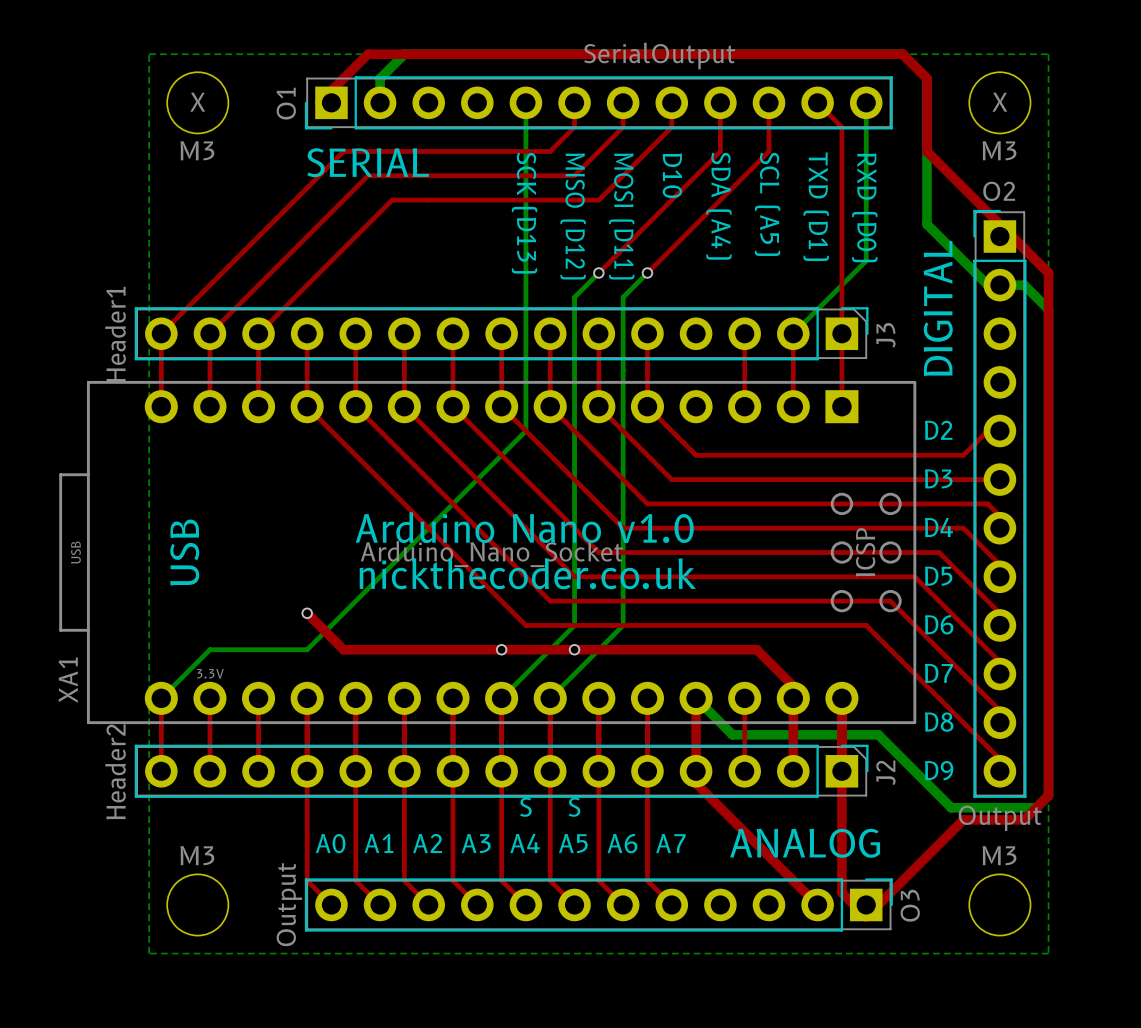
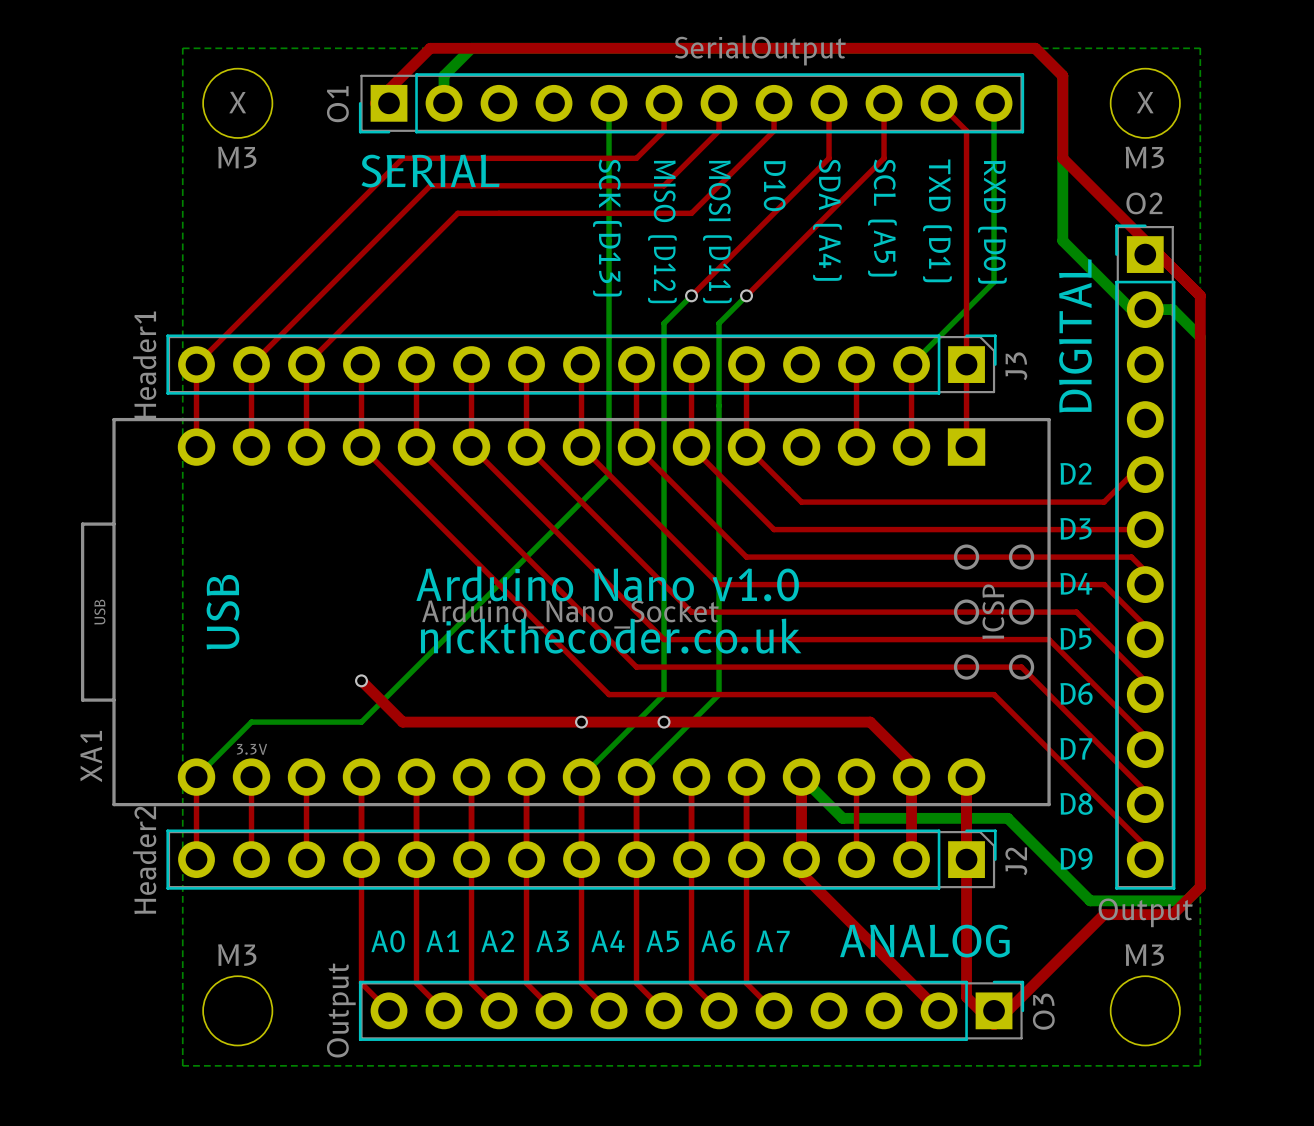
text: S (525, 807) -> none
text: S (574, 807) -> none

